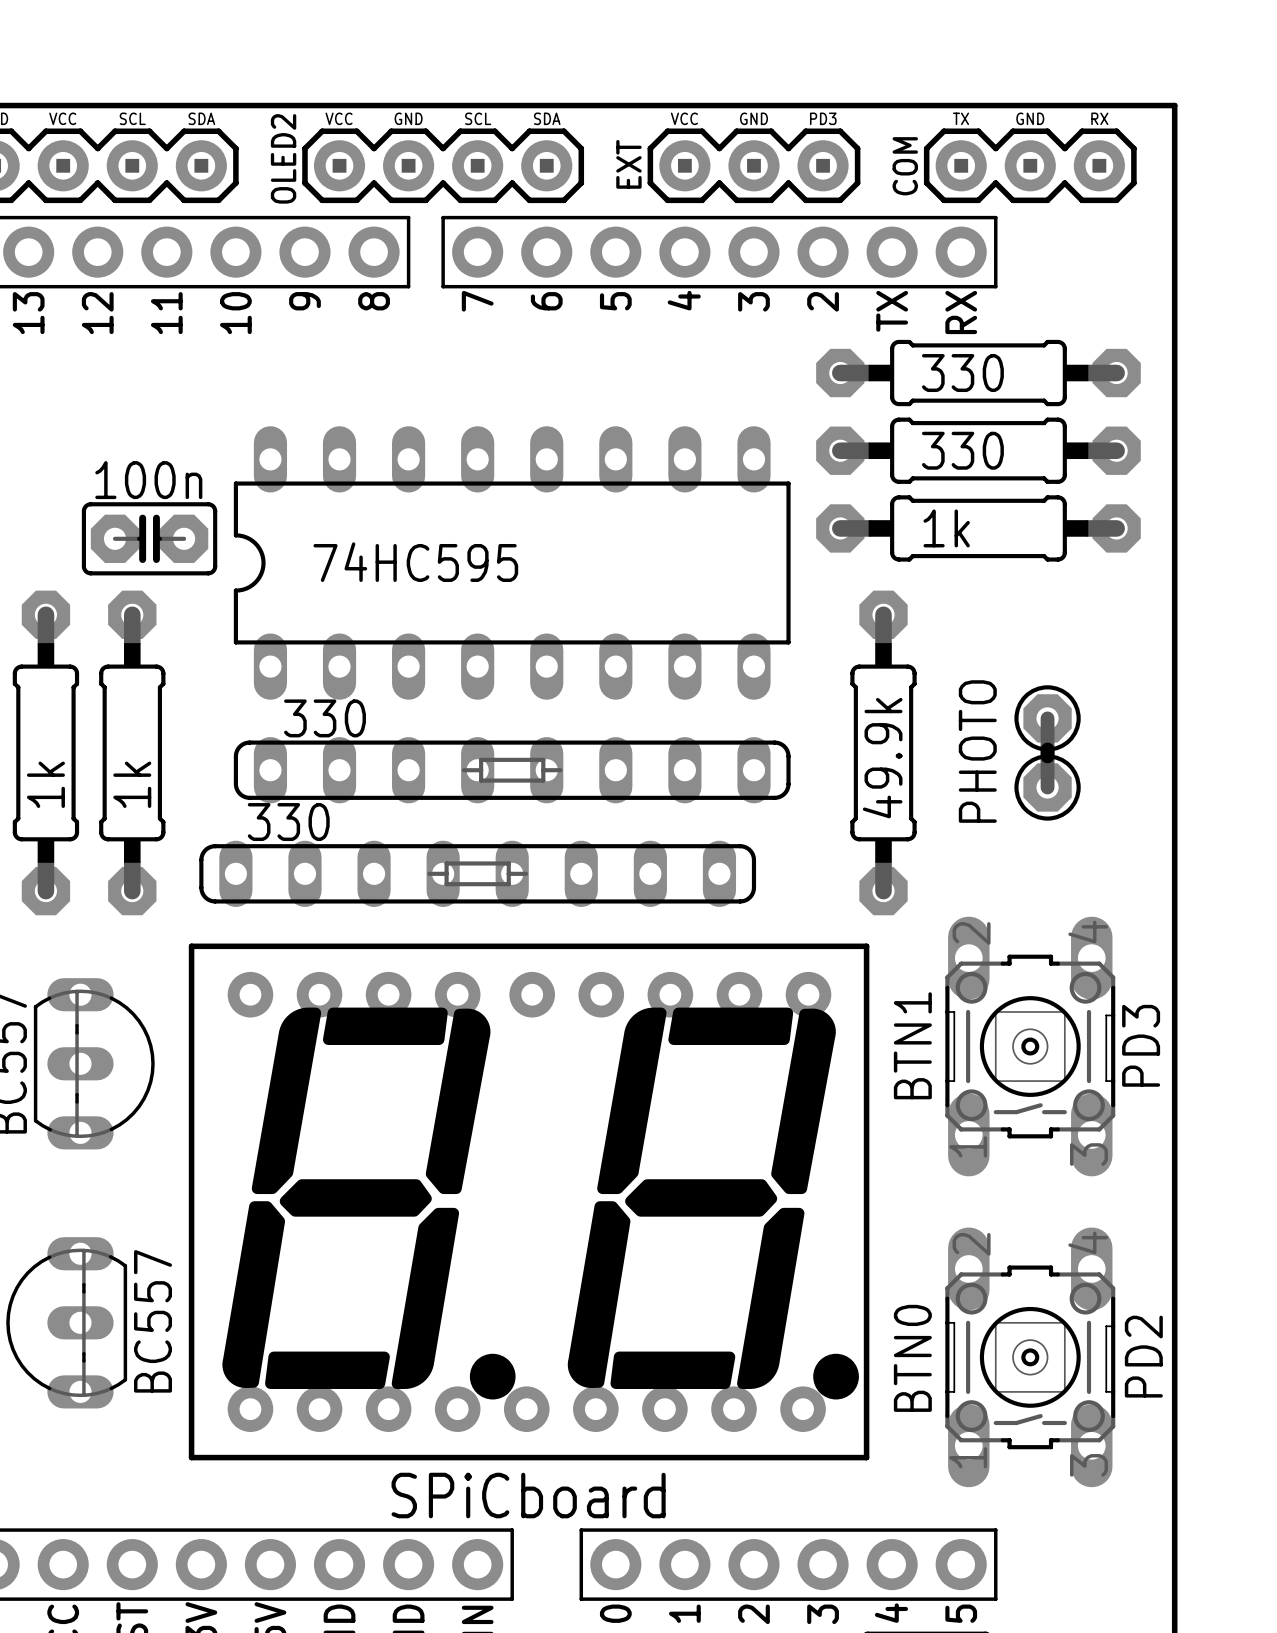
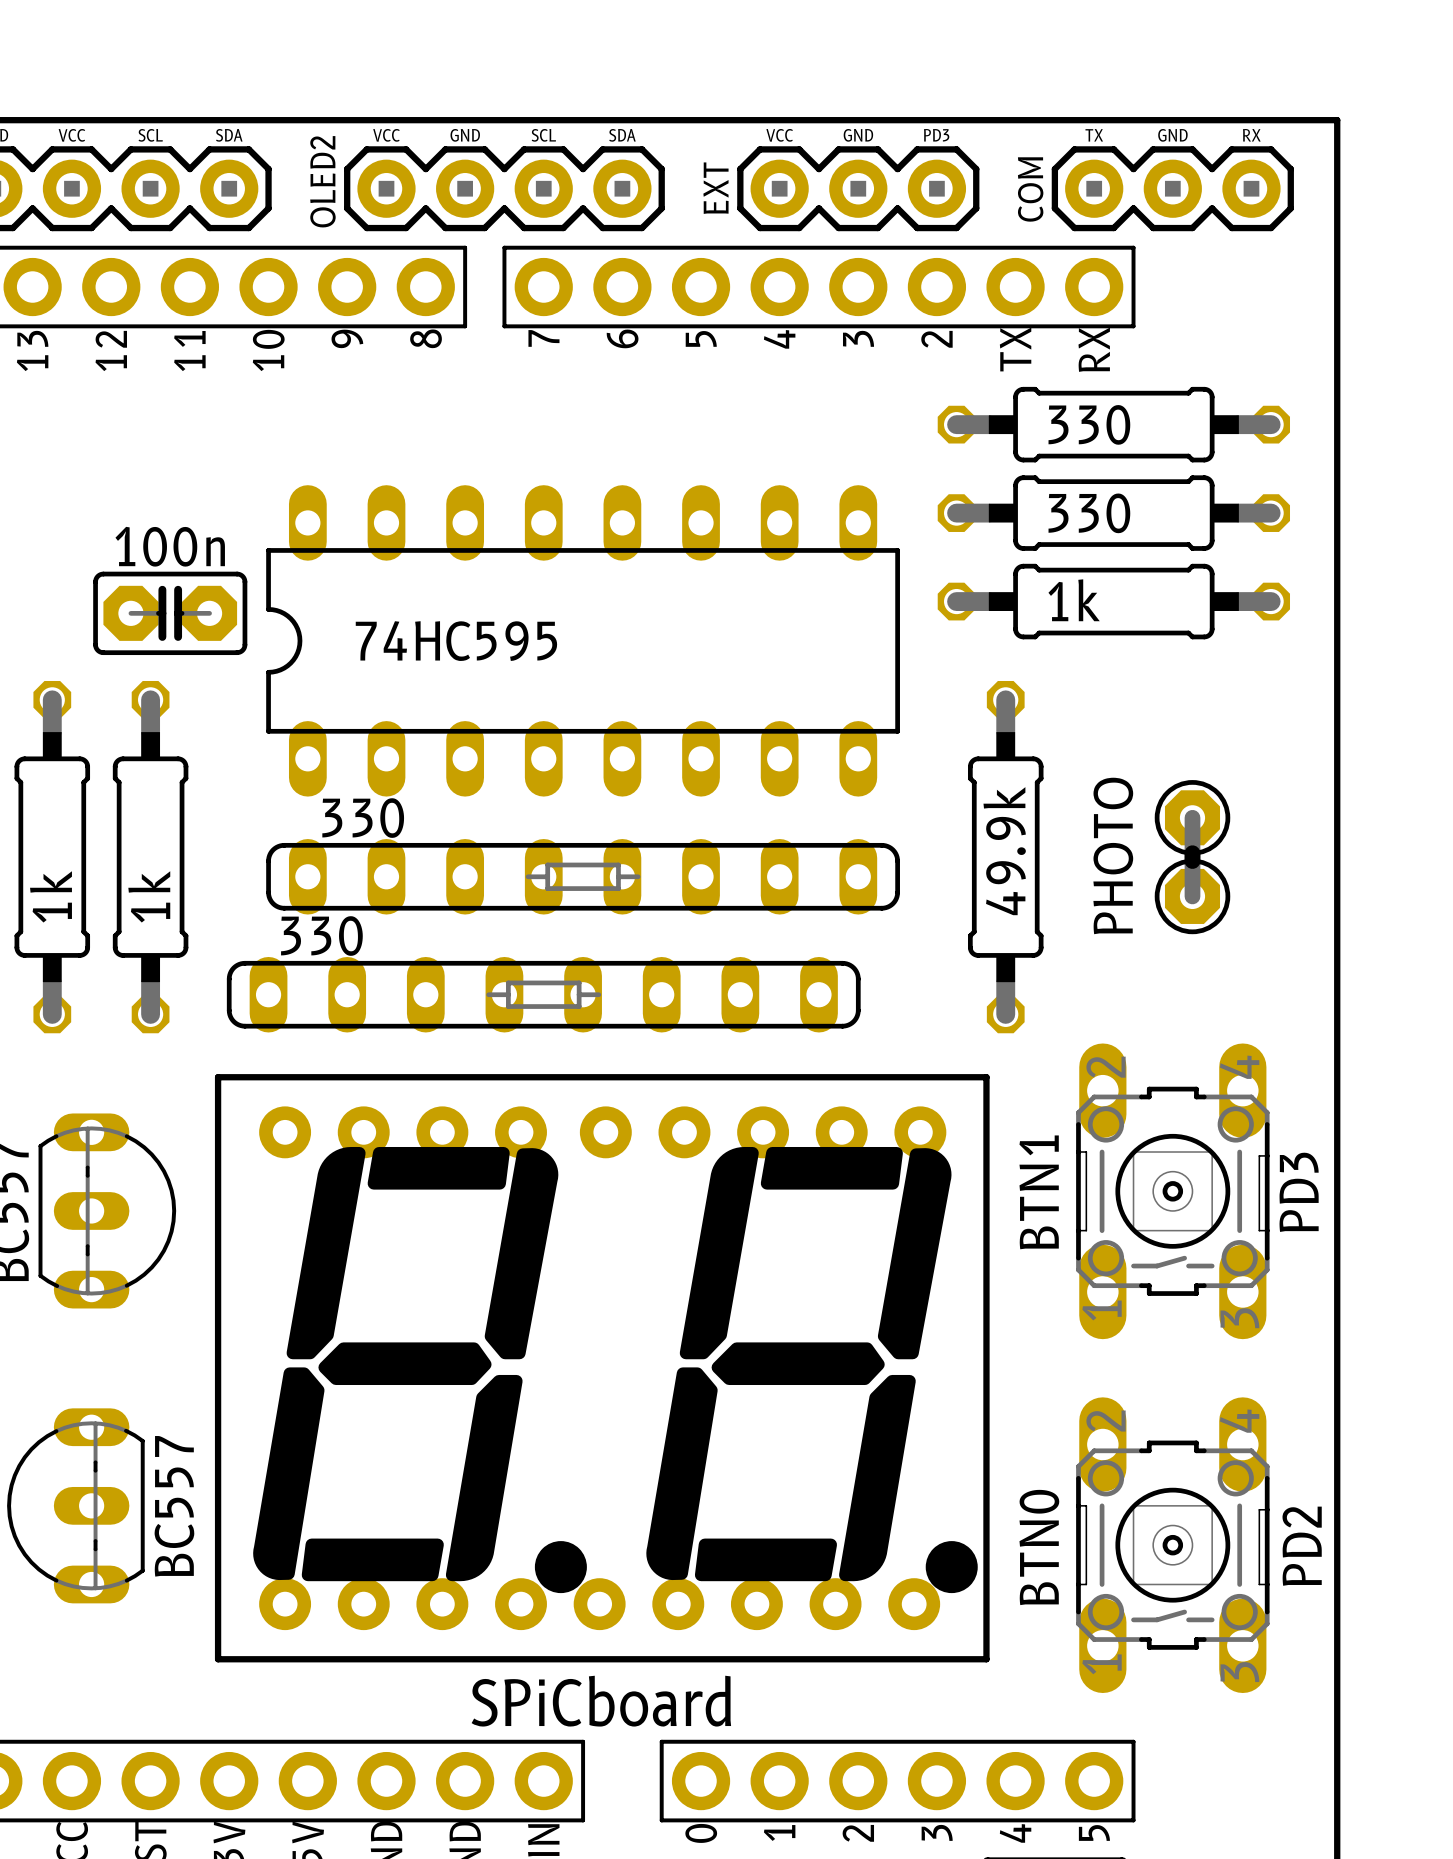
part footprint: [816, 339, 1141, 407] -> [937, 386, 1291, 463]
part footprint: [816, 417, 1141, 484] -> [937, 475, 1291, 551]
part footprint: [816, 495, 1141, 562] -> [937, 563, 1291, 640]
part footprint: [12, 590, 80, 916] -> [14, 680, 91, 1034]
part footprint: [99, 590, 166, 916] -> [112, 680, 189, 1034]
part footprint: [850, 590, 917, 916] -> [967, 680, 1044, 1034]

